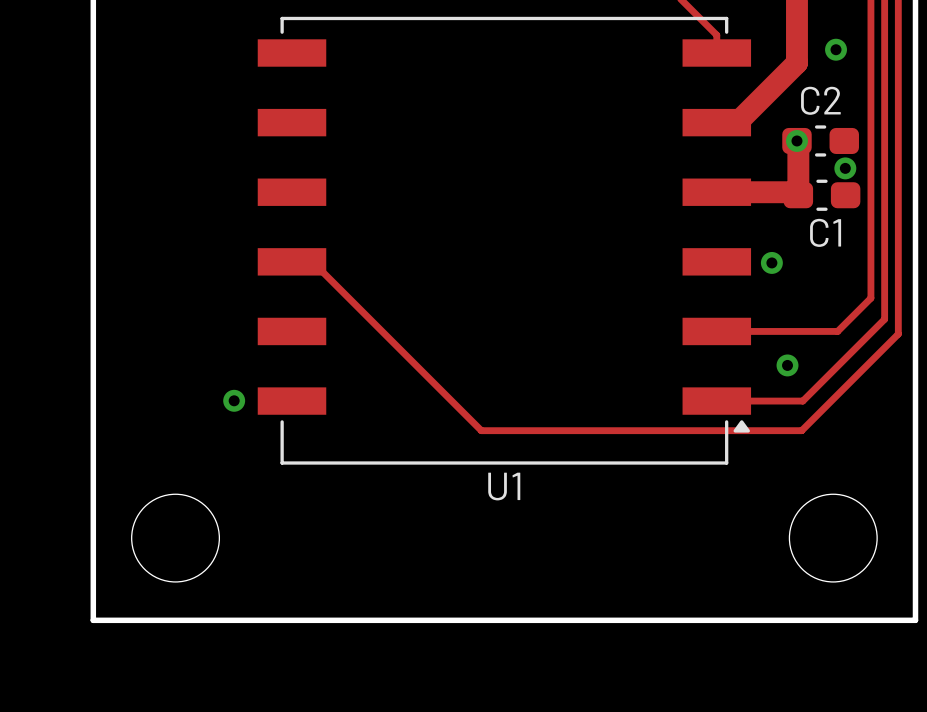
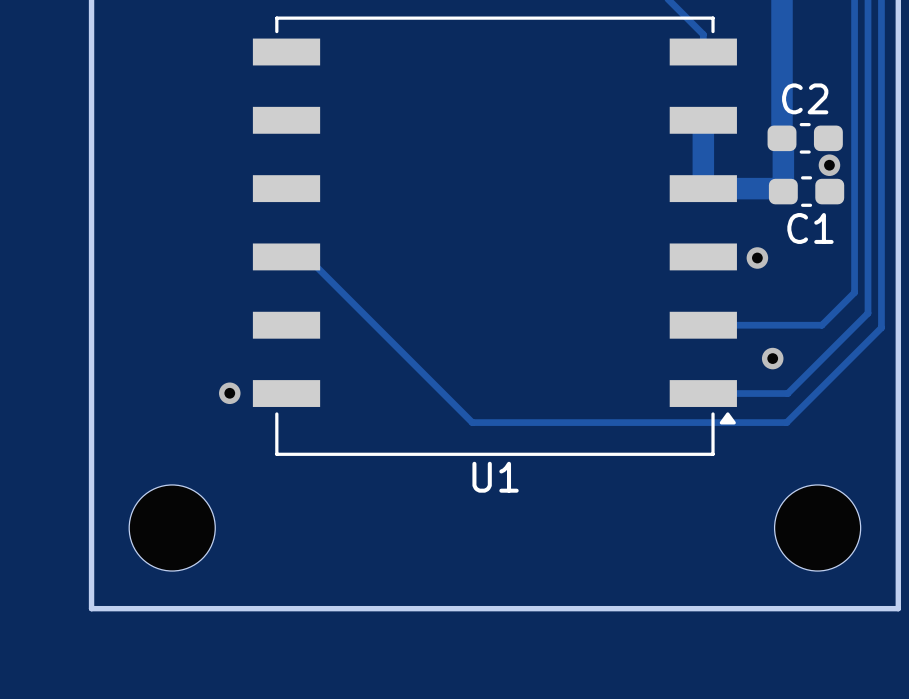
via: (836, 49) -> none
track: (796, 62) (737, 122) (716, 122) -> (782, 61) (782, 138)
track: none -> (703, 120) (703, 188)
via: (796, 140) -> none

